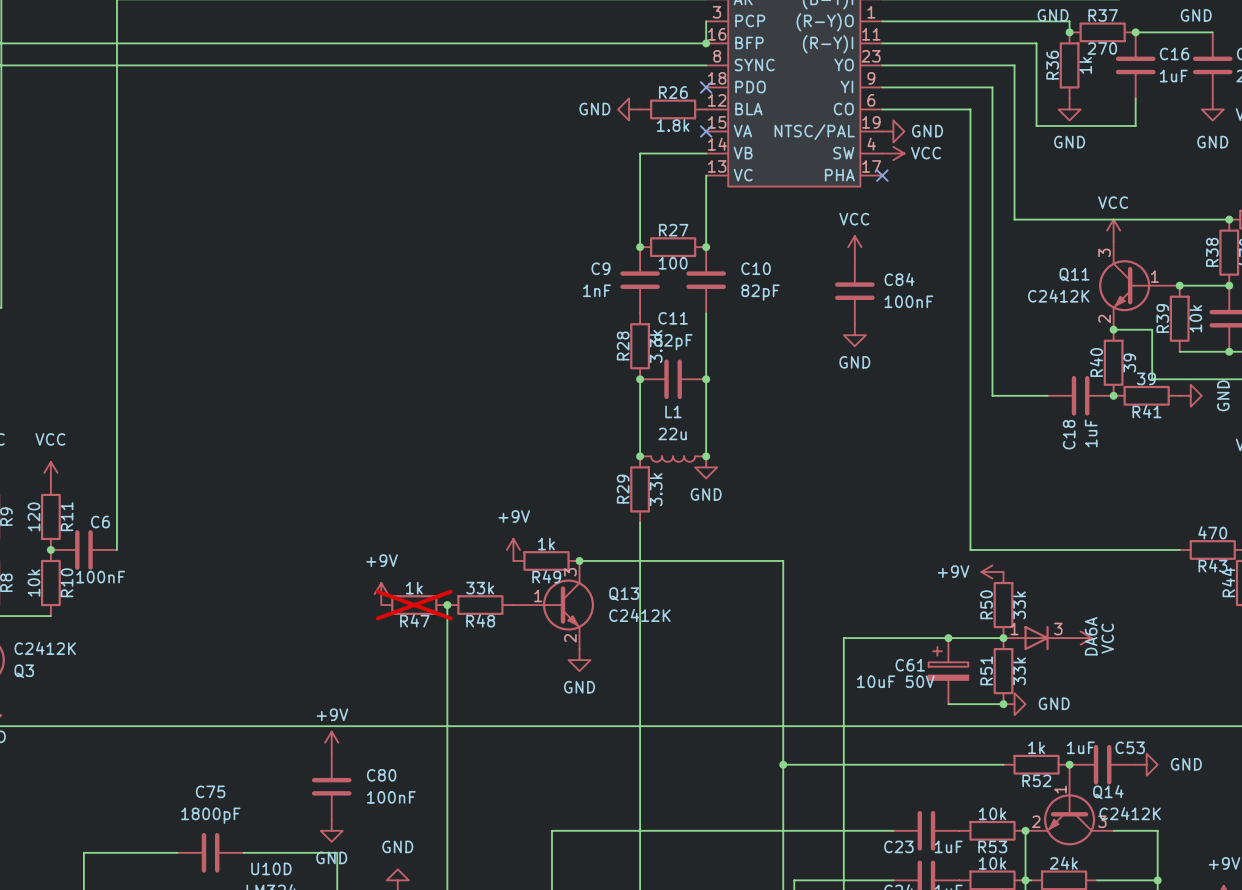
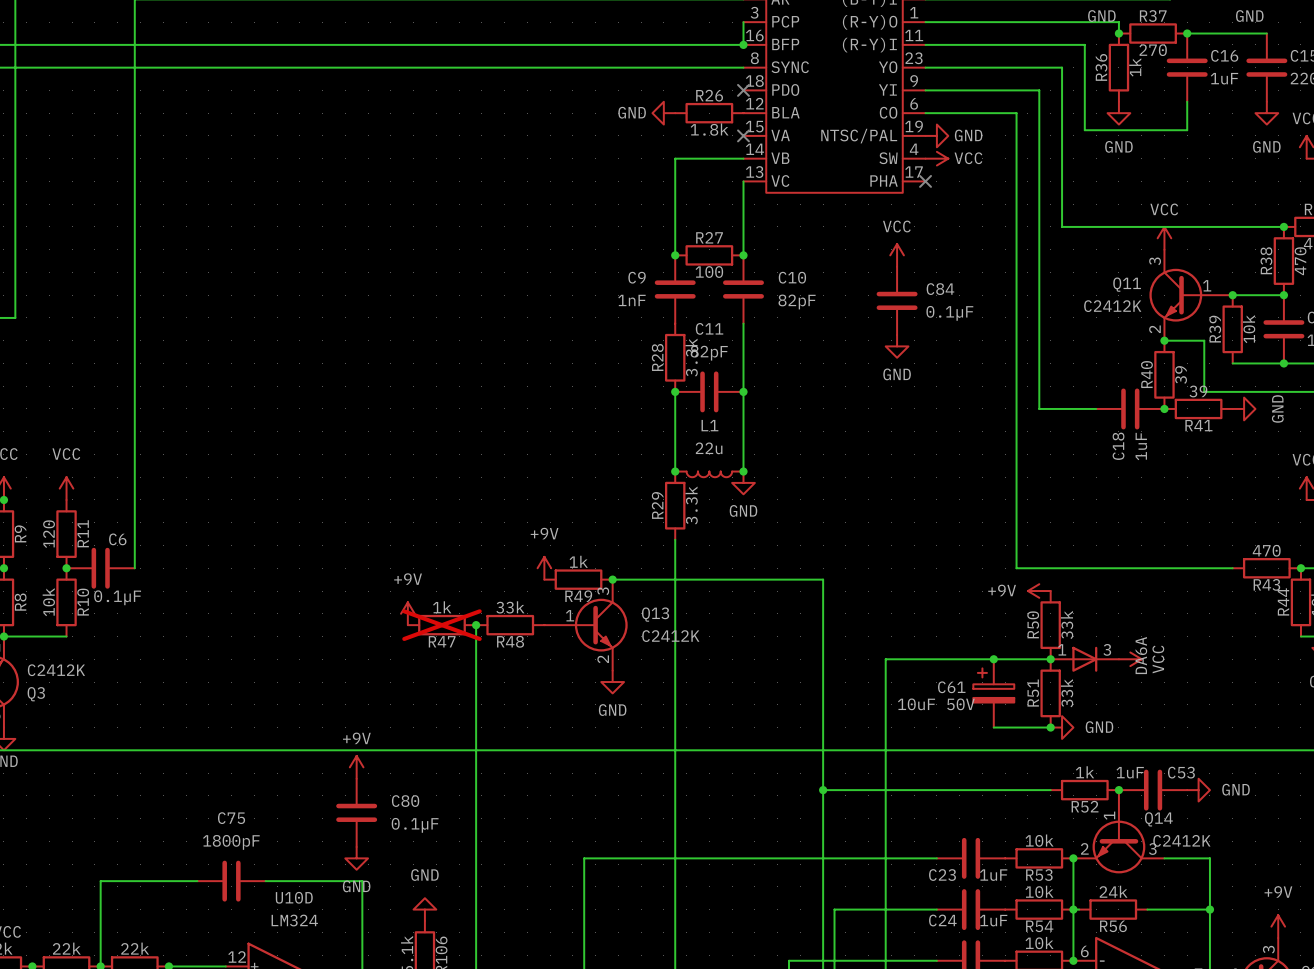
C84 value: 100nF (908, 301) -> 0.1µF (949, 313)
C6 value: 100nF (100, 577) -> 0.1µF (117, 597)
C80 value: 100nF (391, 797) -> 0.1µF (415, 825)

